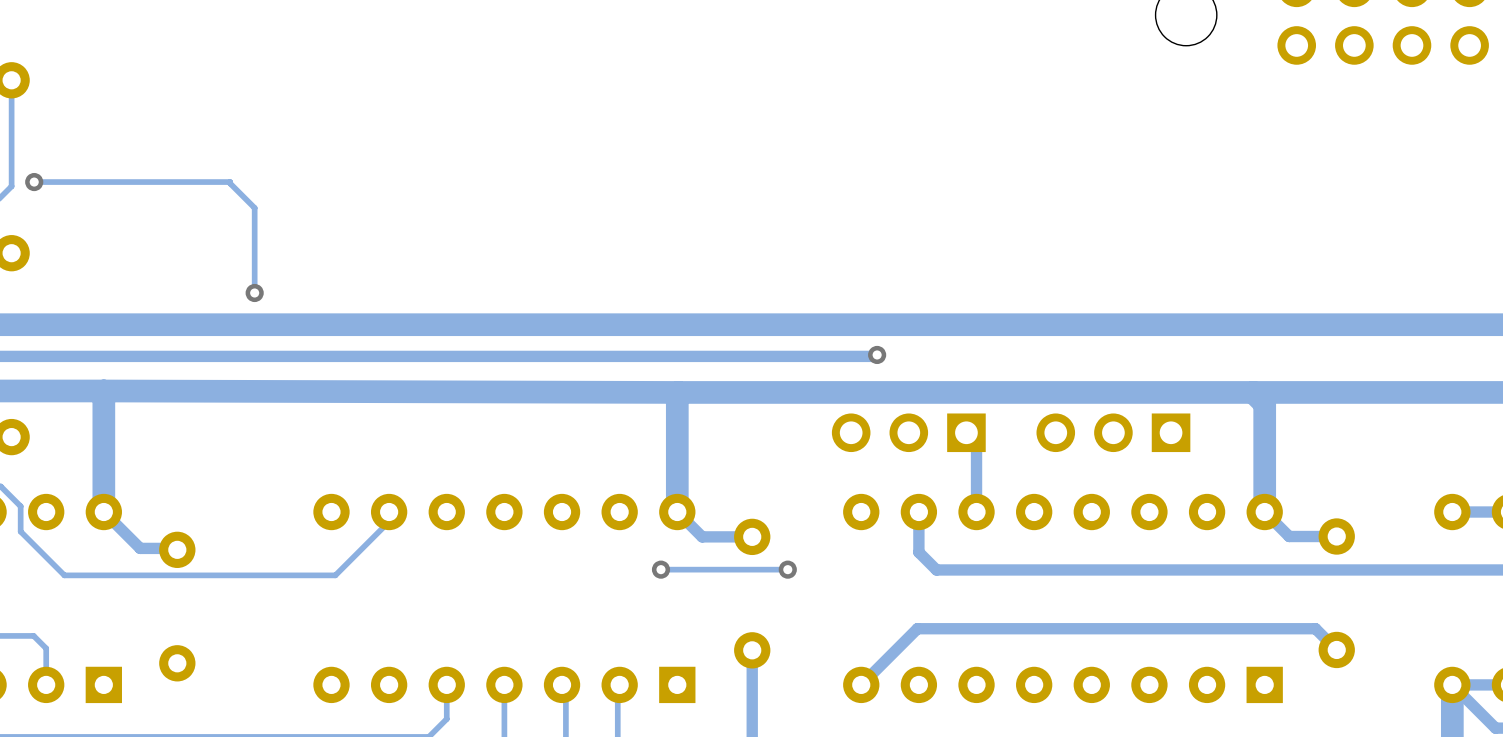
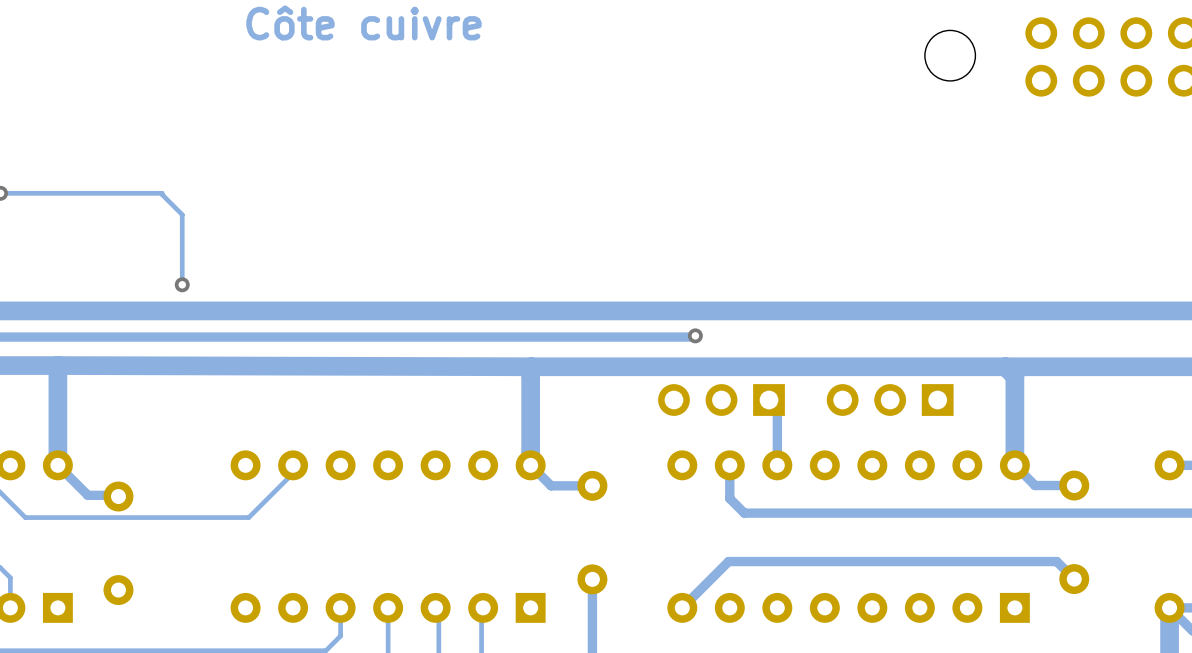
via: (661, 569) -> none
track: (787, 569) (661, 569) -> none
via: (787, 569) -> none

